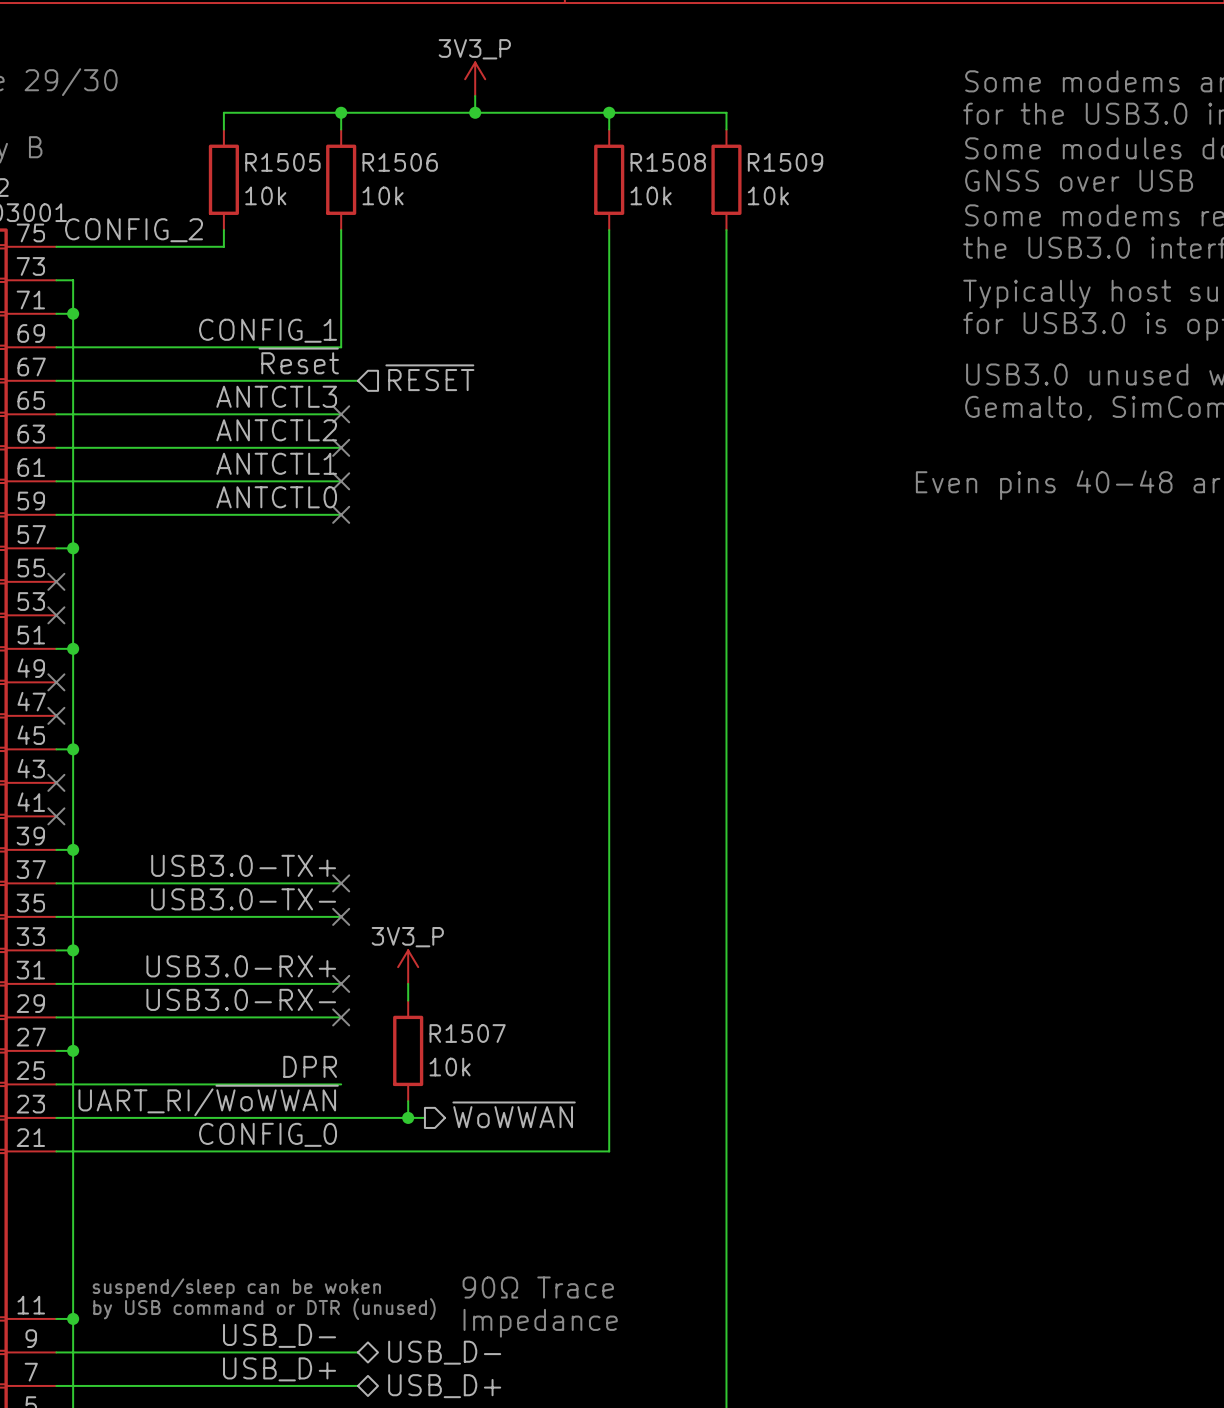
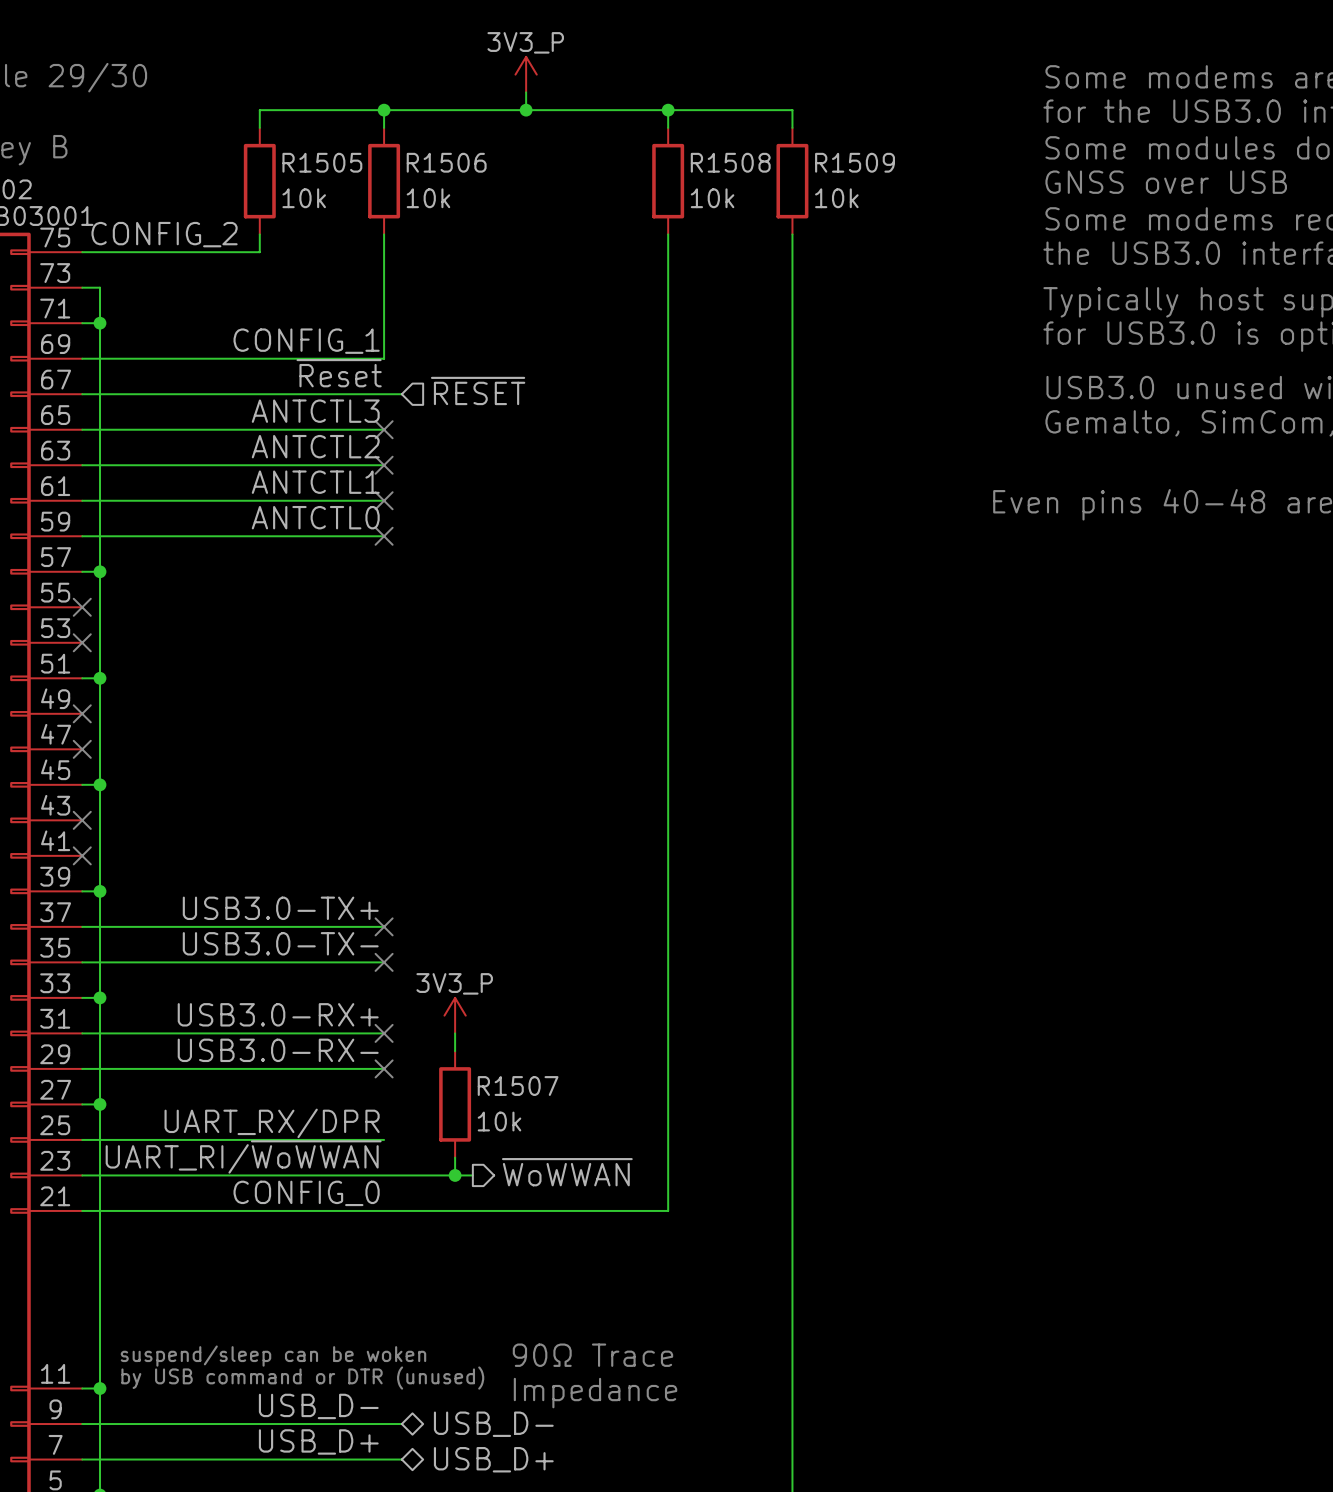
label: DPR (310, 1066) -> UART_RX/DPR (272, 1123)

